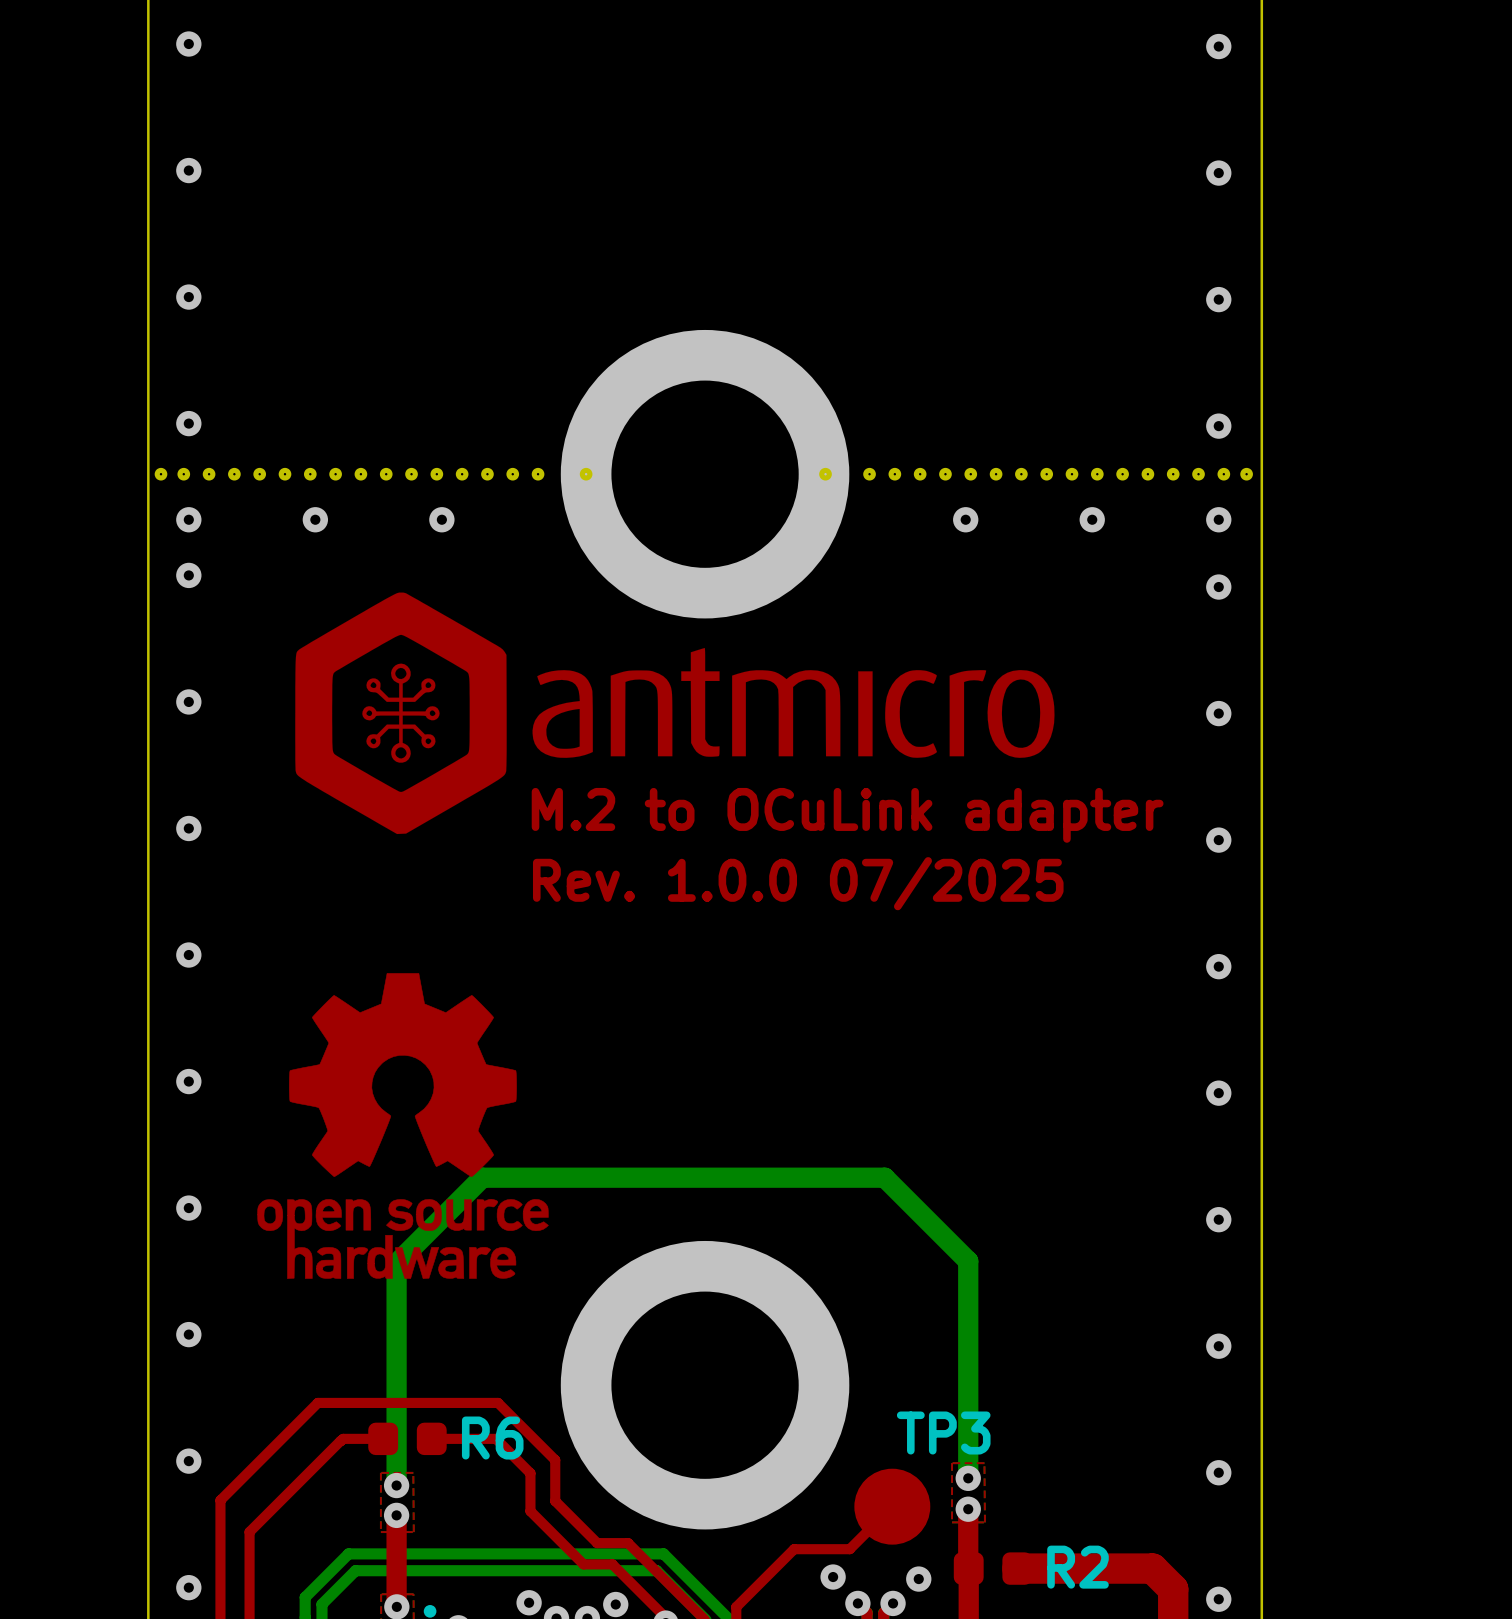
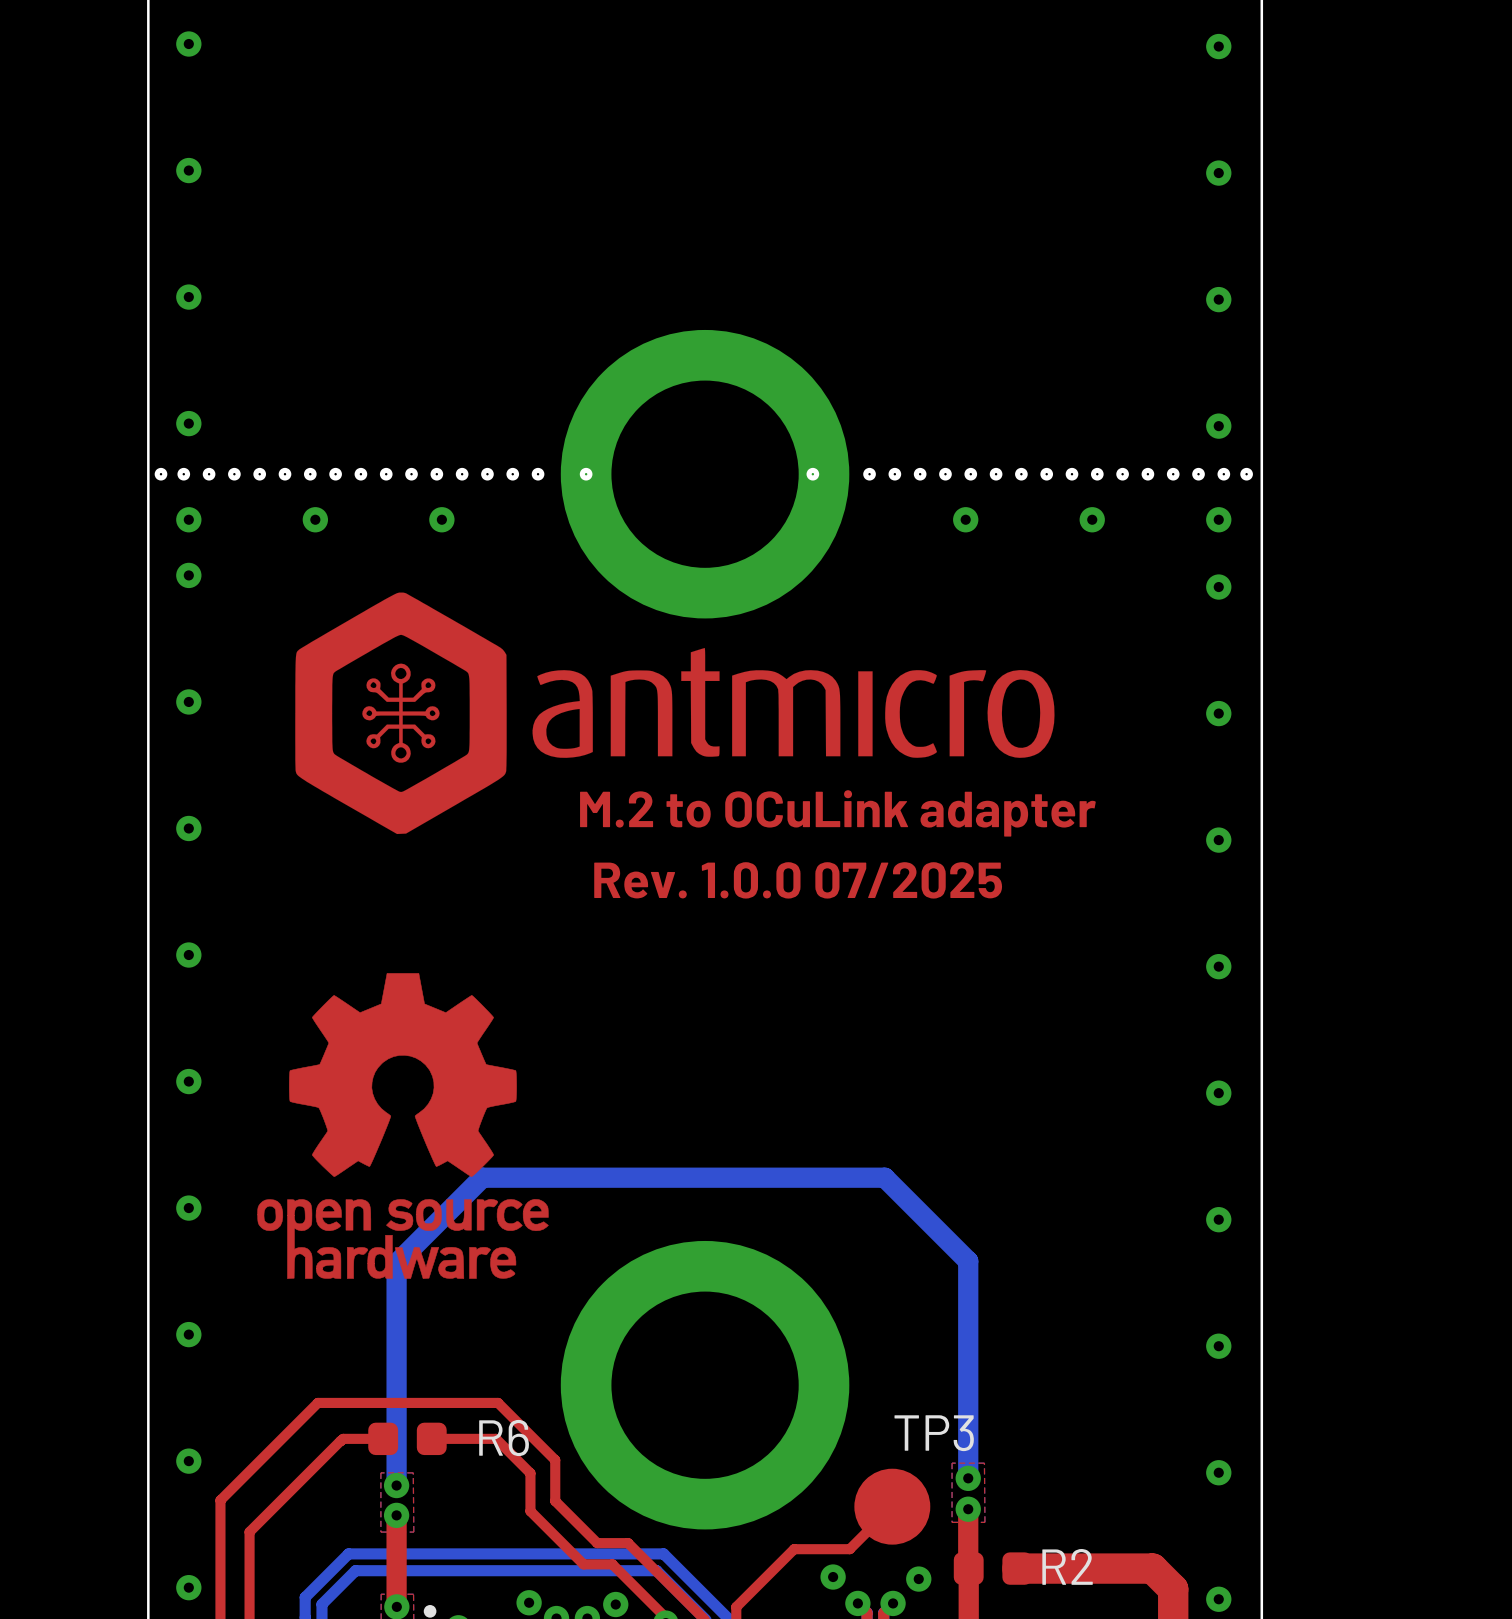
round board edge position: (825, 474) -> (812, 474)

